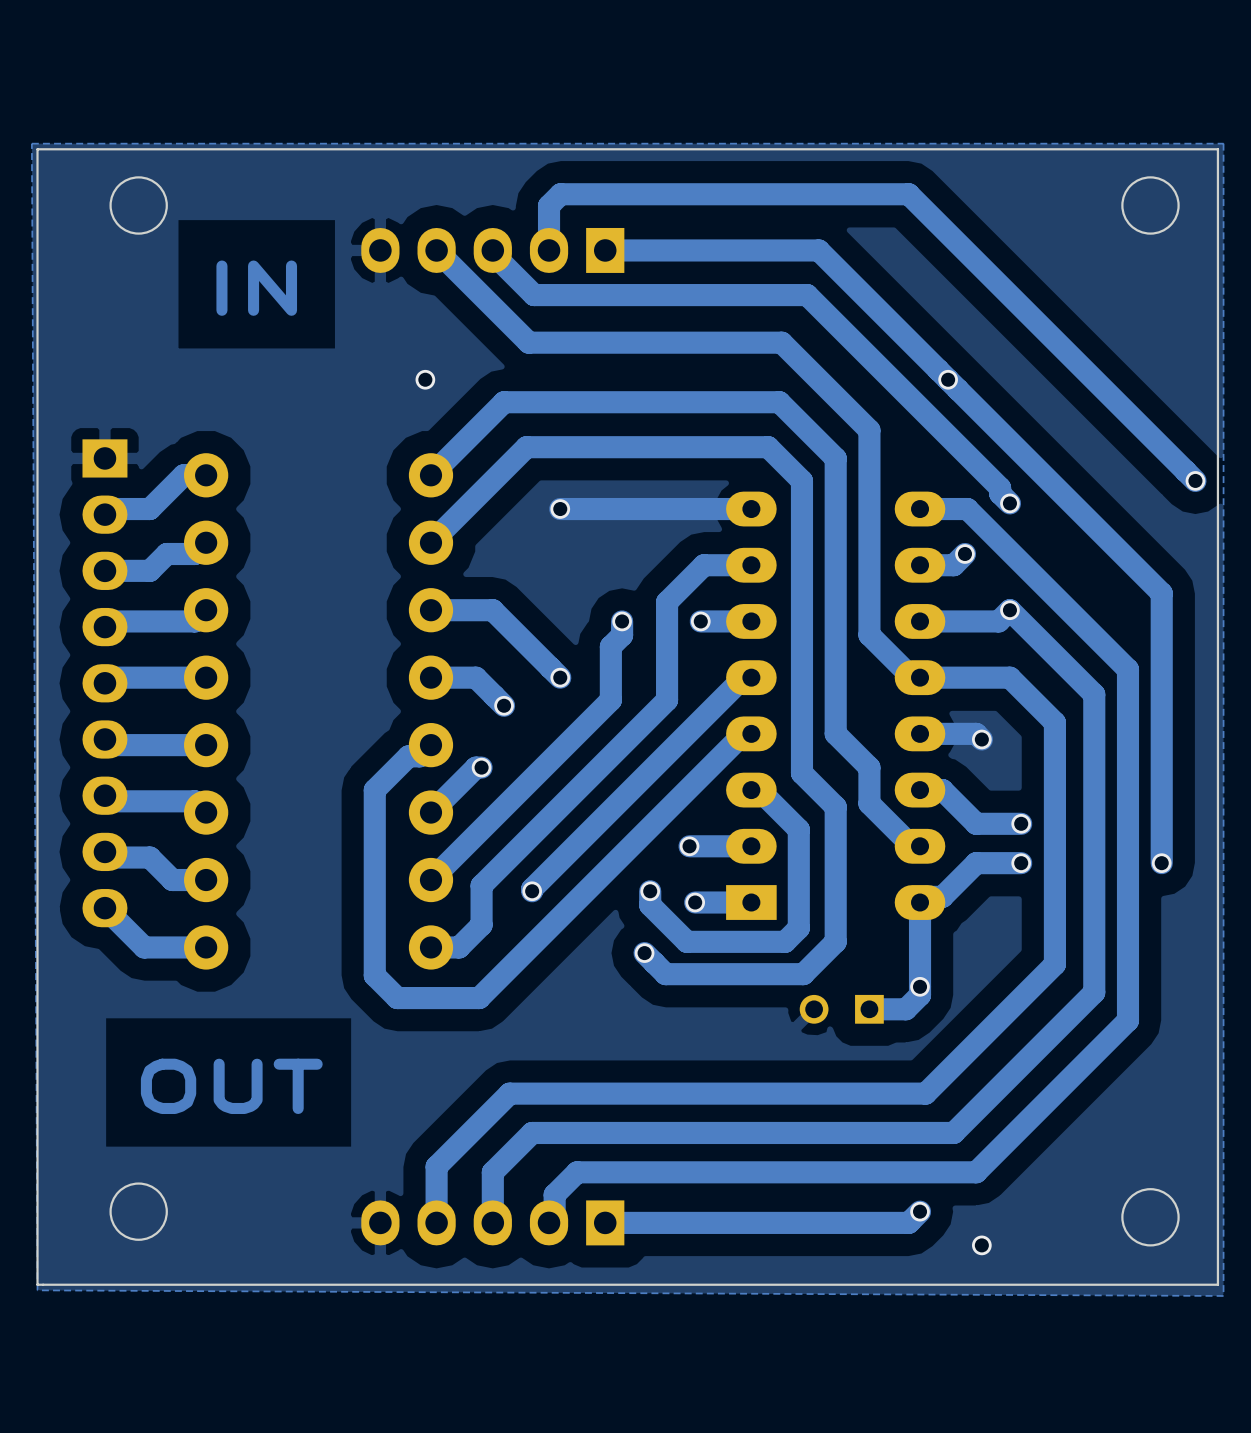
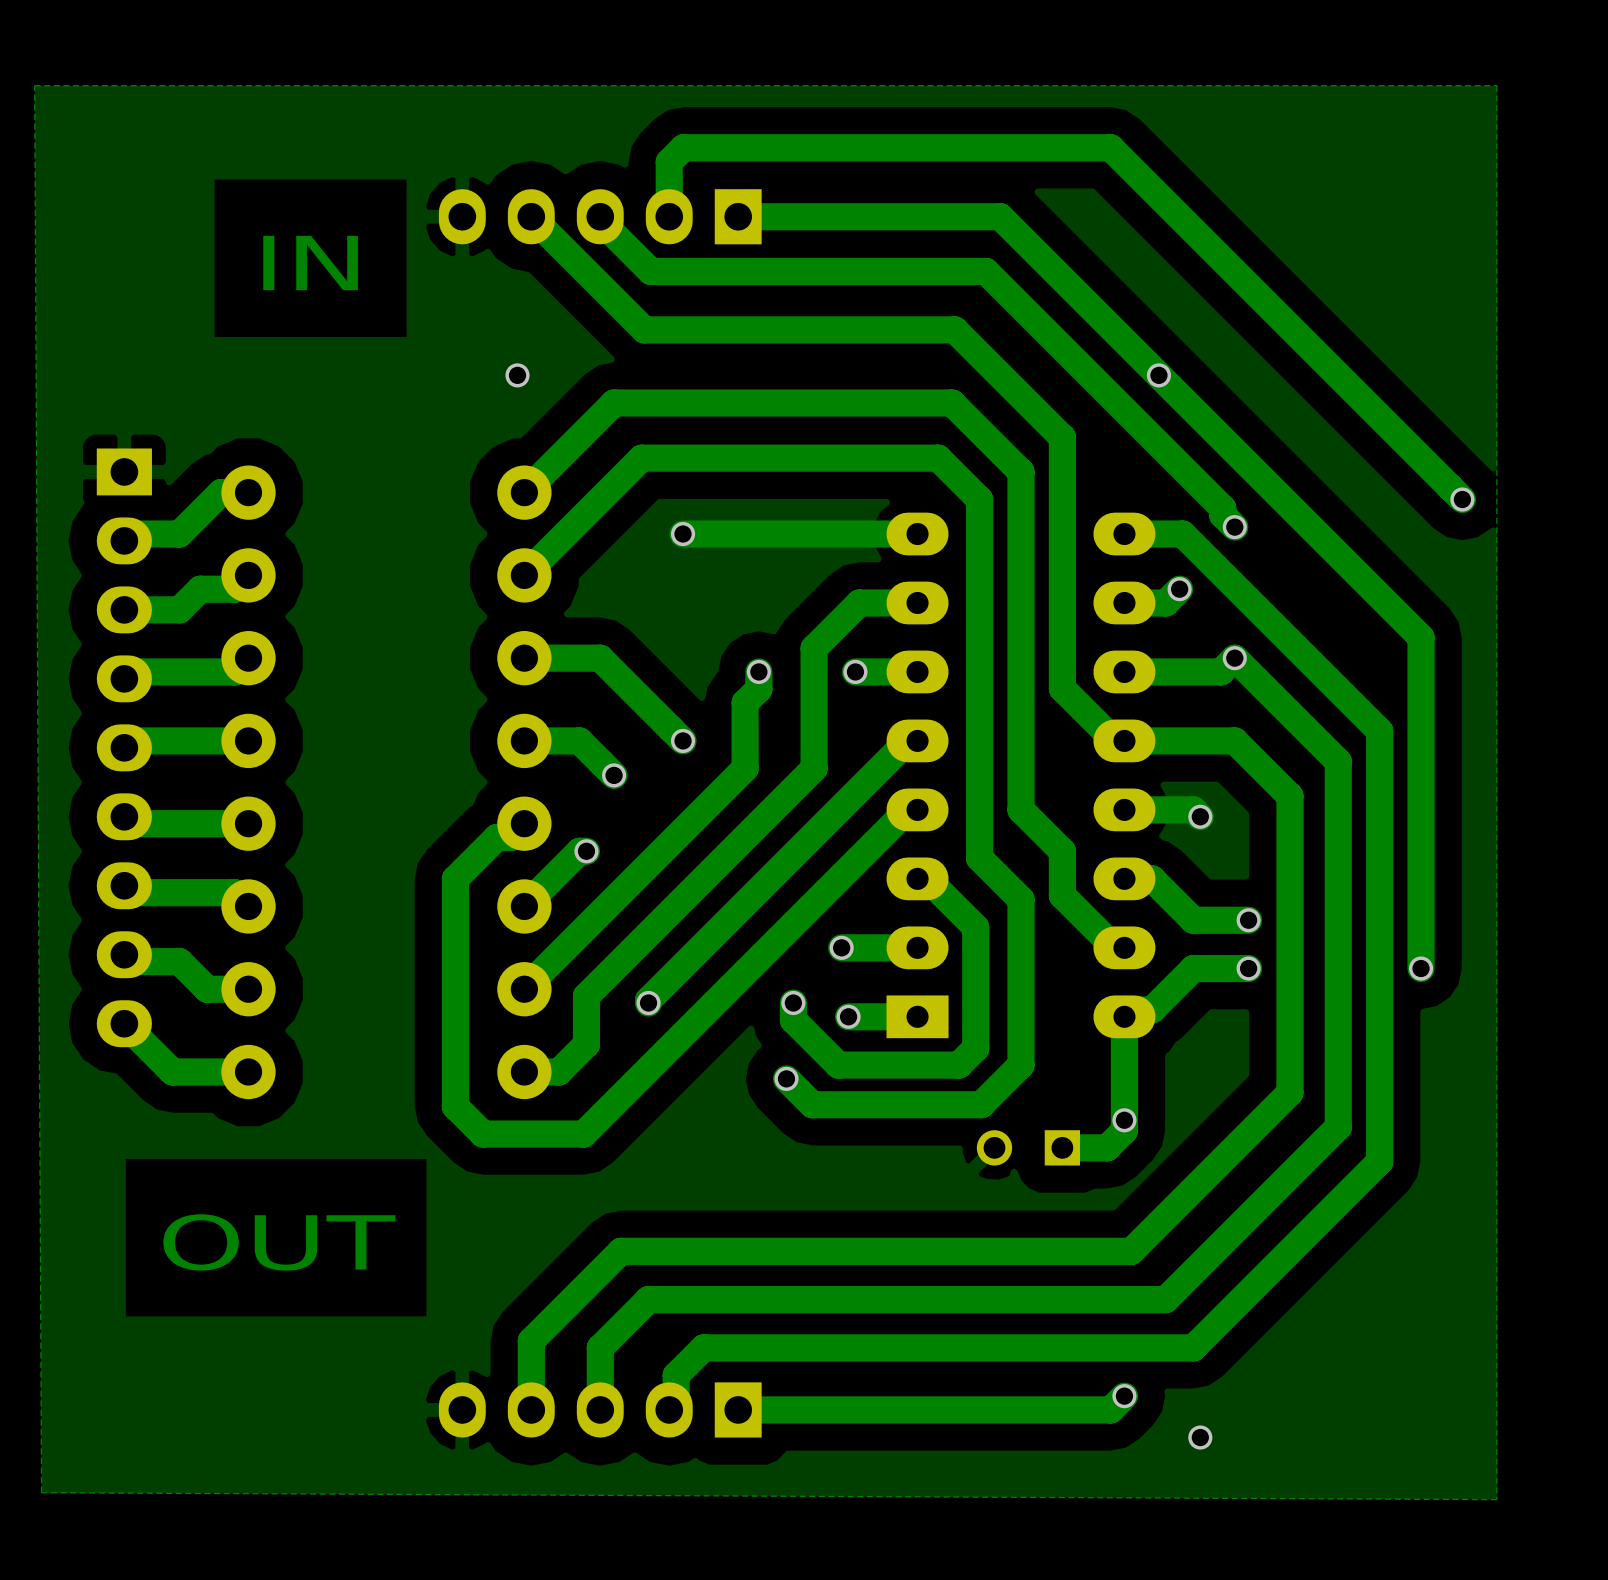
board edge: (1217, 149) (37, 149) (37, 1284) (1217, 1284) (1217, 149) -> none
round board edge: [109, 176, 168, 235] -> none
round board edge: [1121, 176, 1180, 235] -> none
round board edge: [109, 1182, 168, 1241] -> none
round board edge: [1121, 1188, 1180, 1247] -> none

